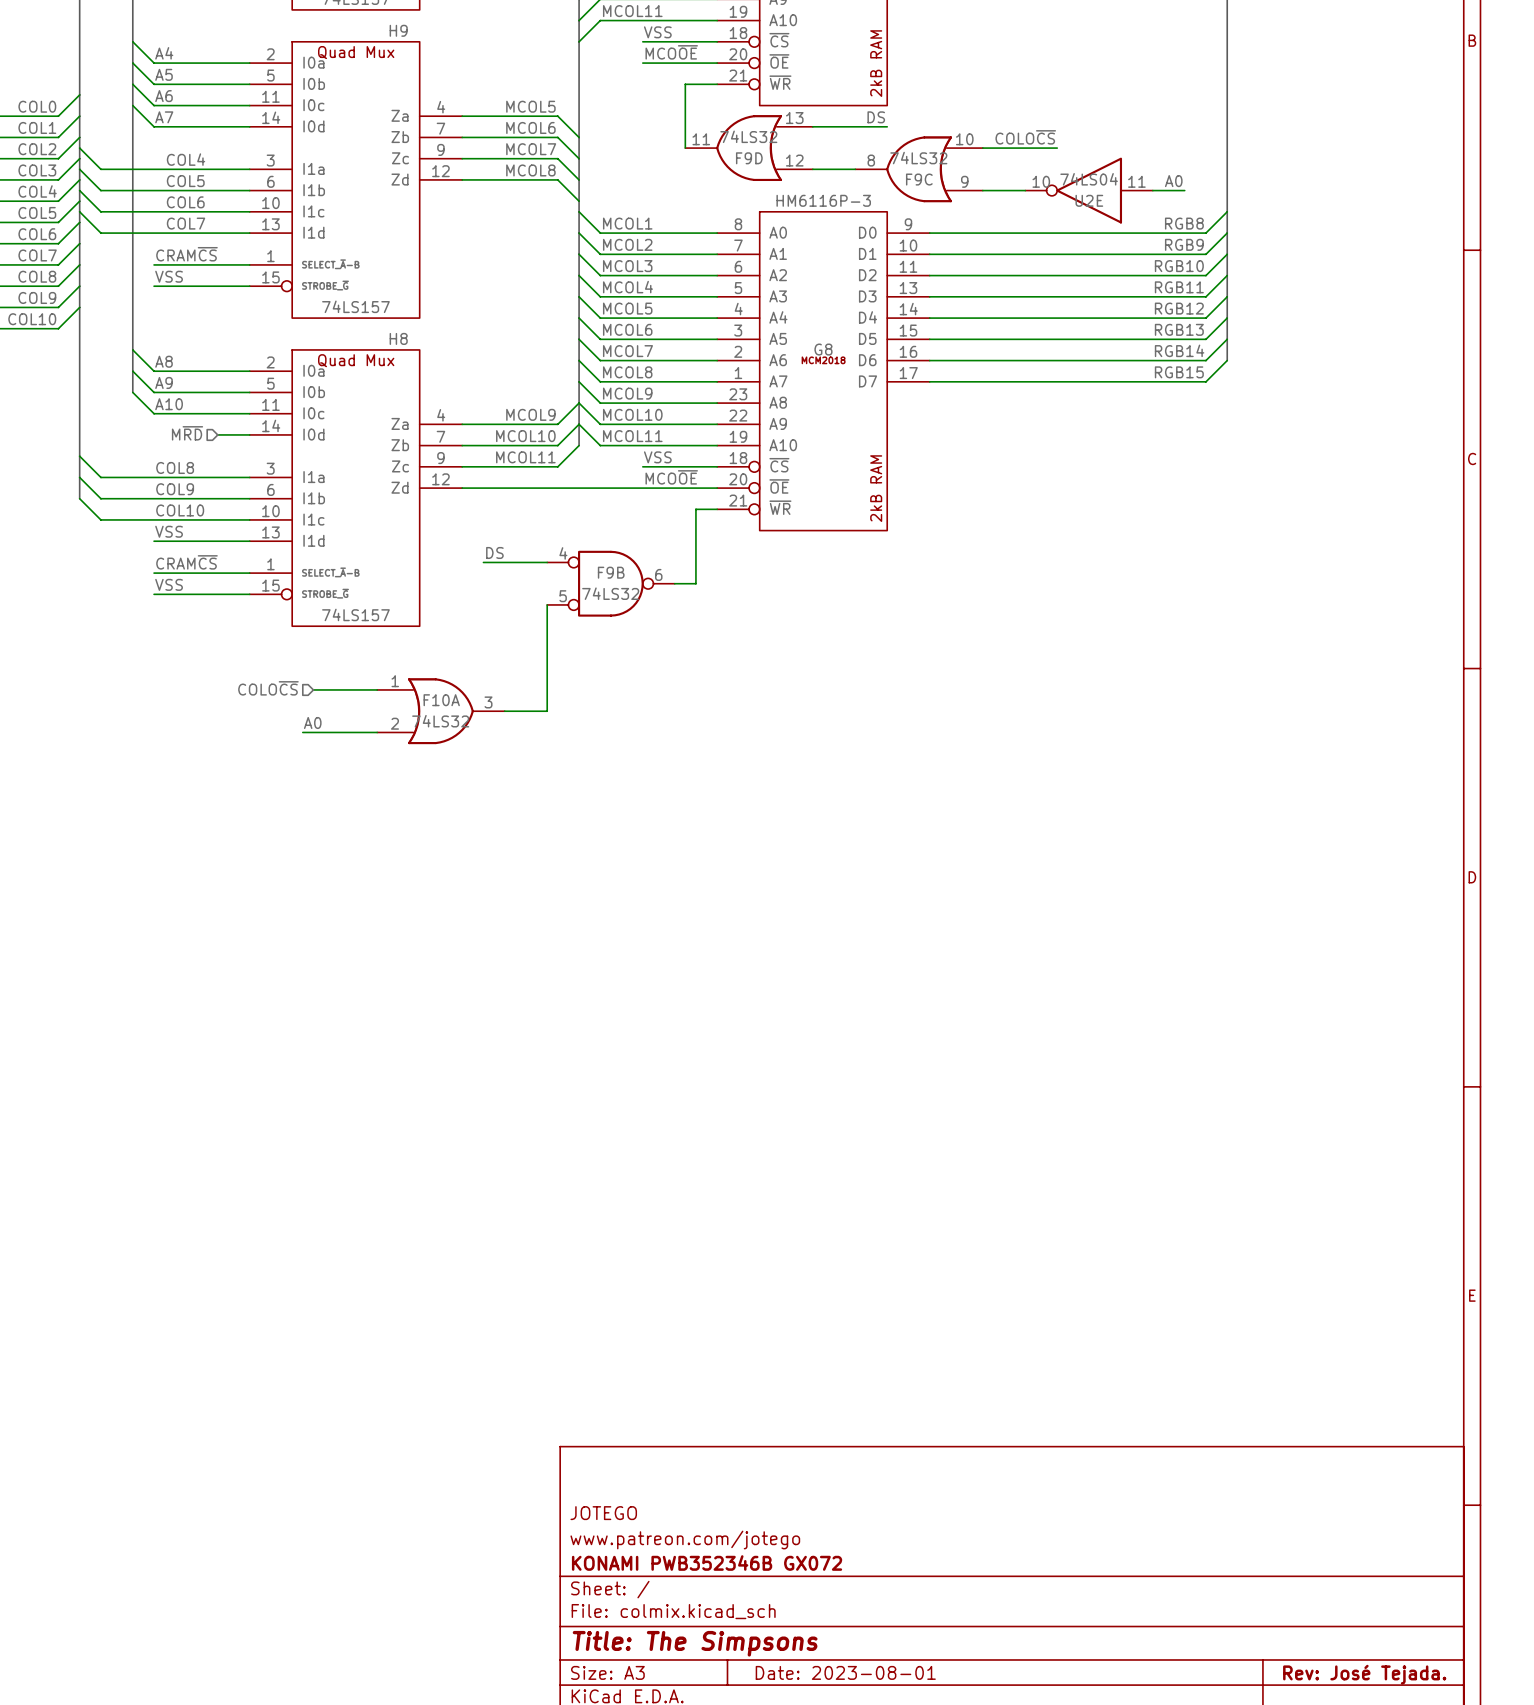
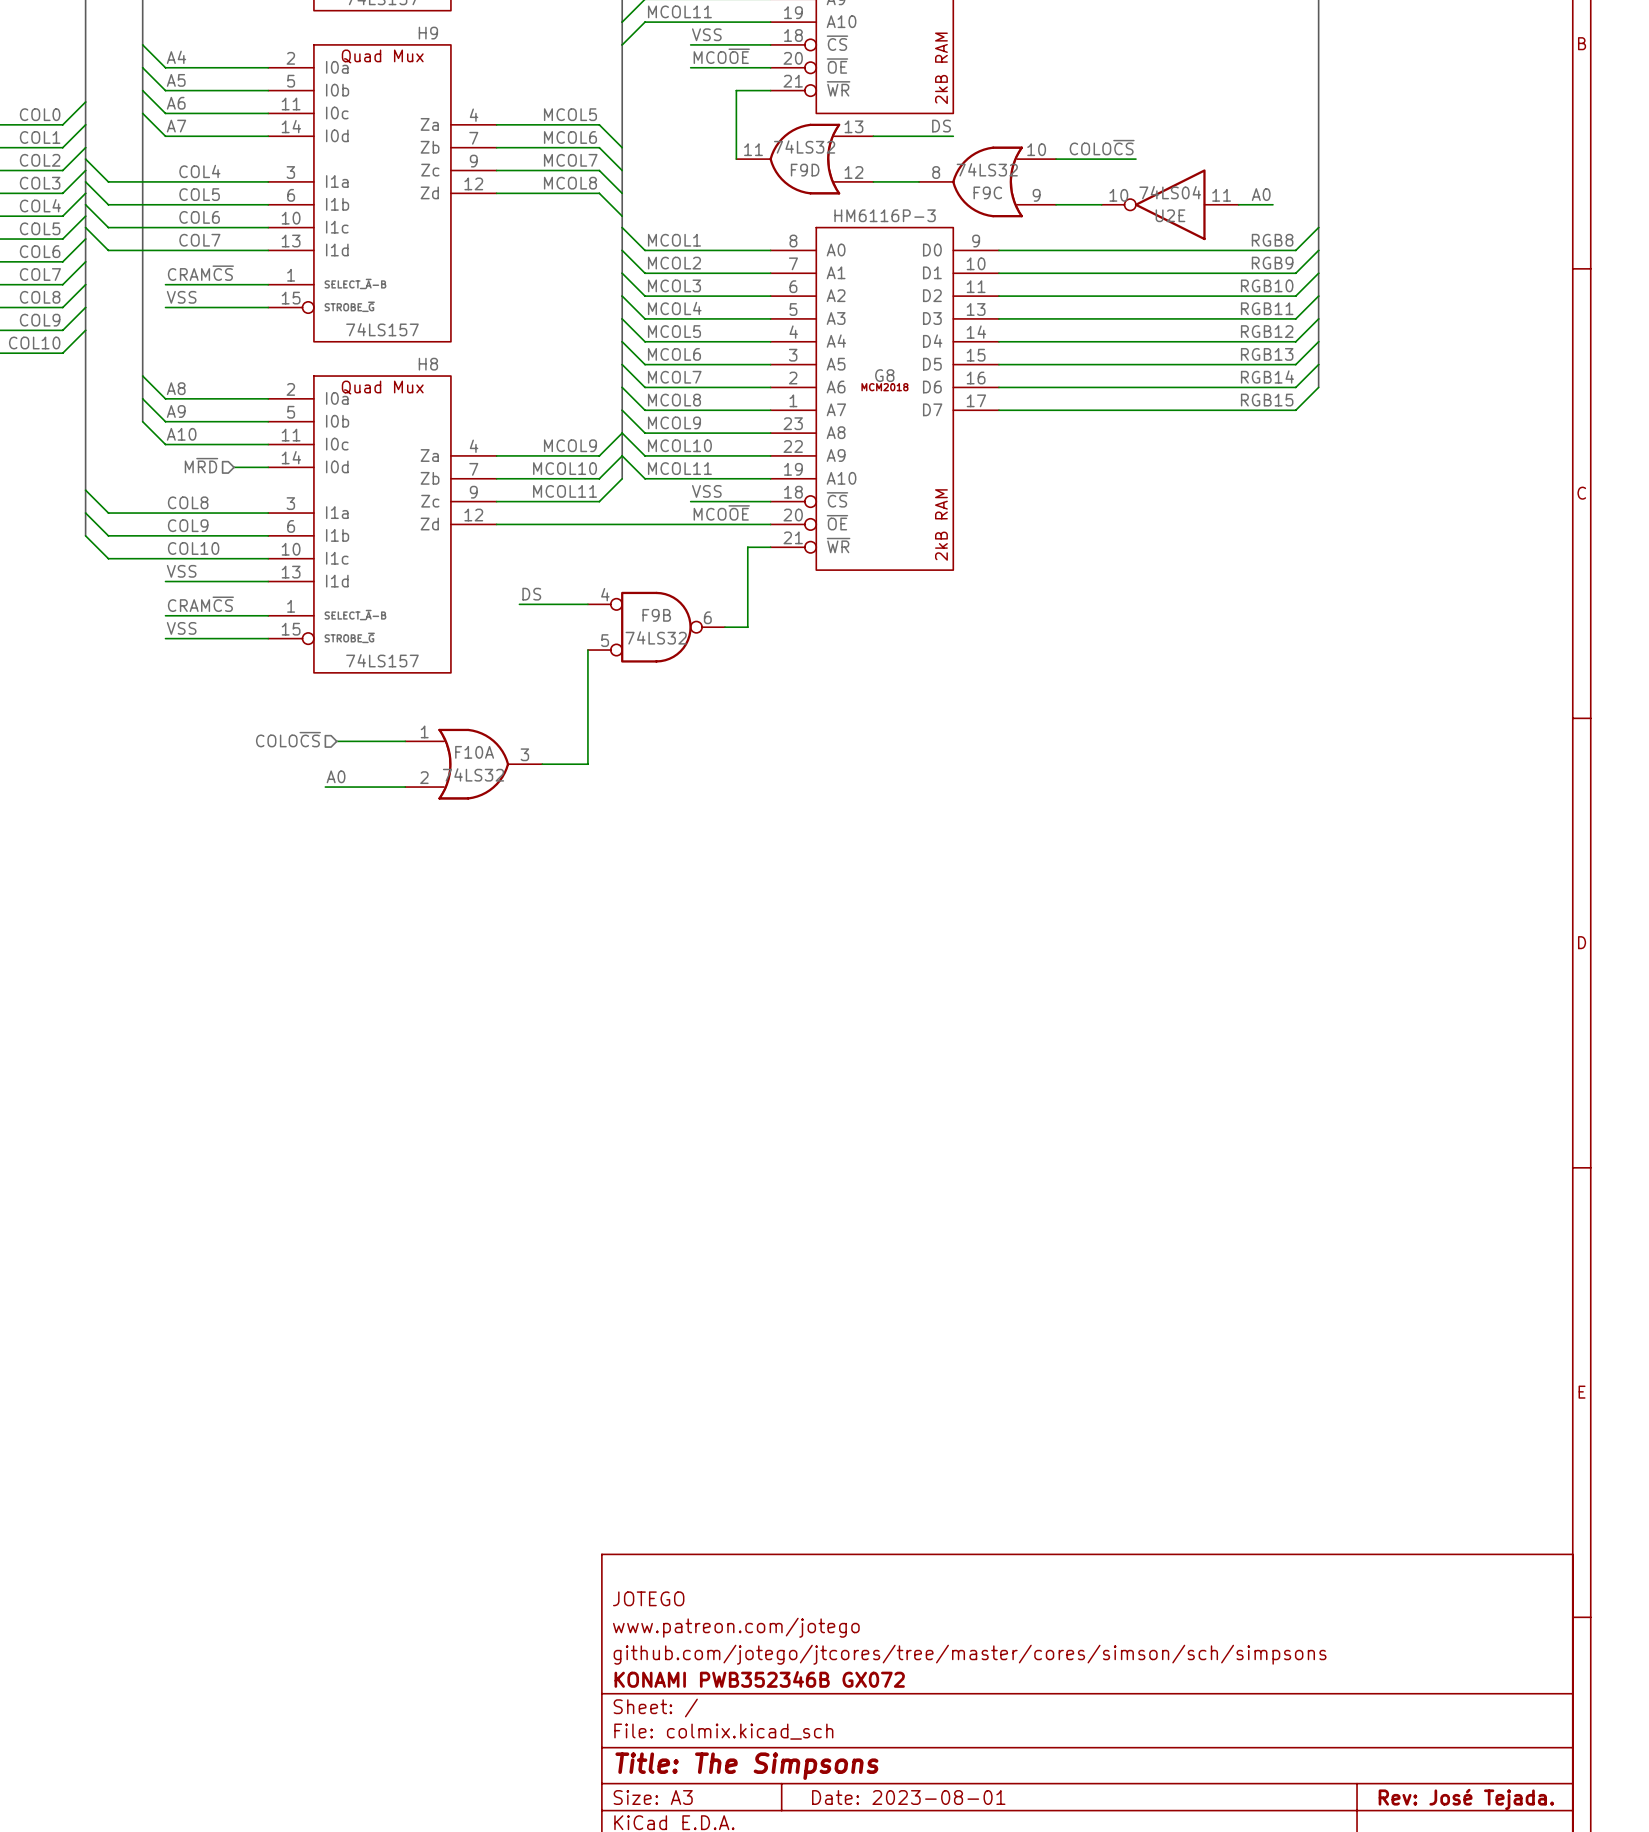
title block: none -> JOTEGO (648, 1598)
title block: JOTEGO (603, 1513) -> www.patreon.com/jotego (736, 1627)
title block: www.patreon.com/jotego (685, 1540) -> github.com/jotego/jtcores/tree/master/cores/simson/sch/simpsons (970, 1654)

